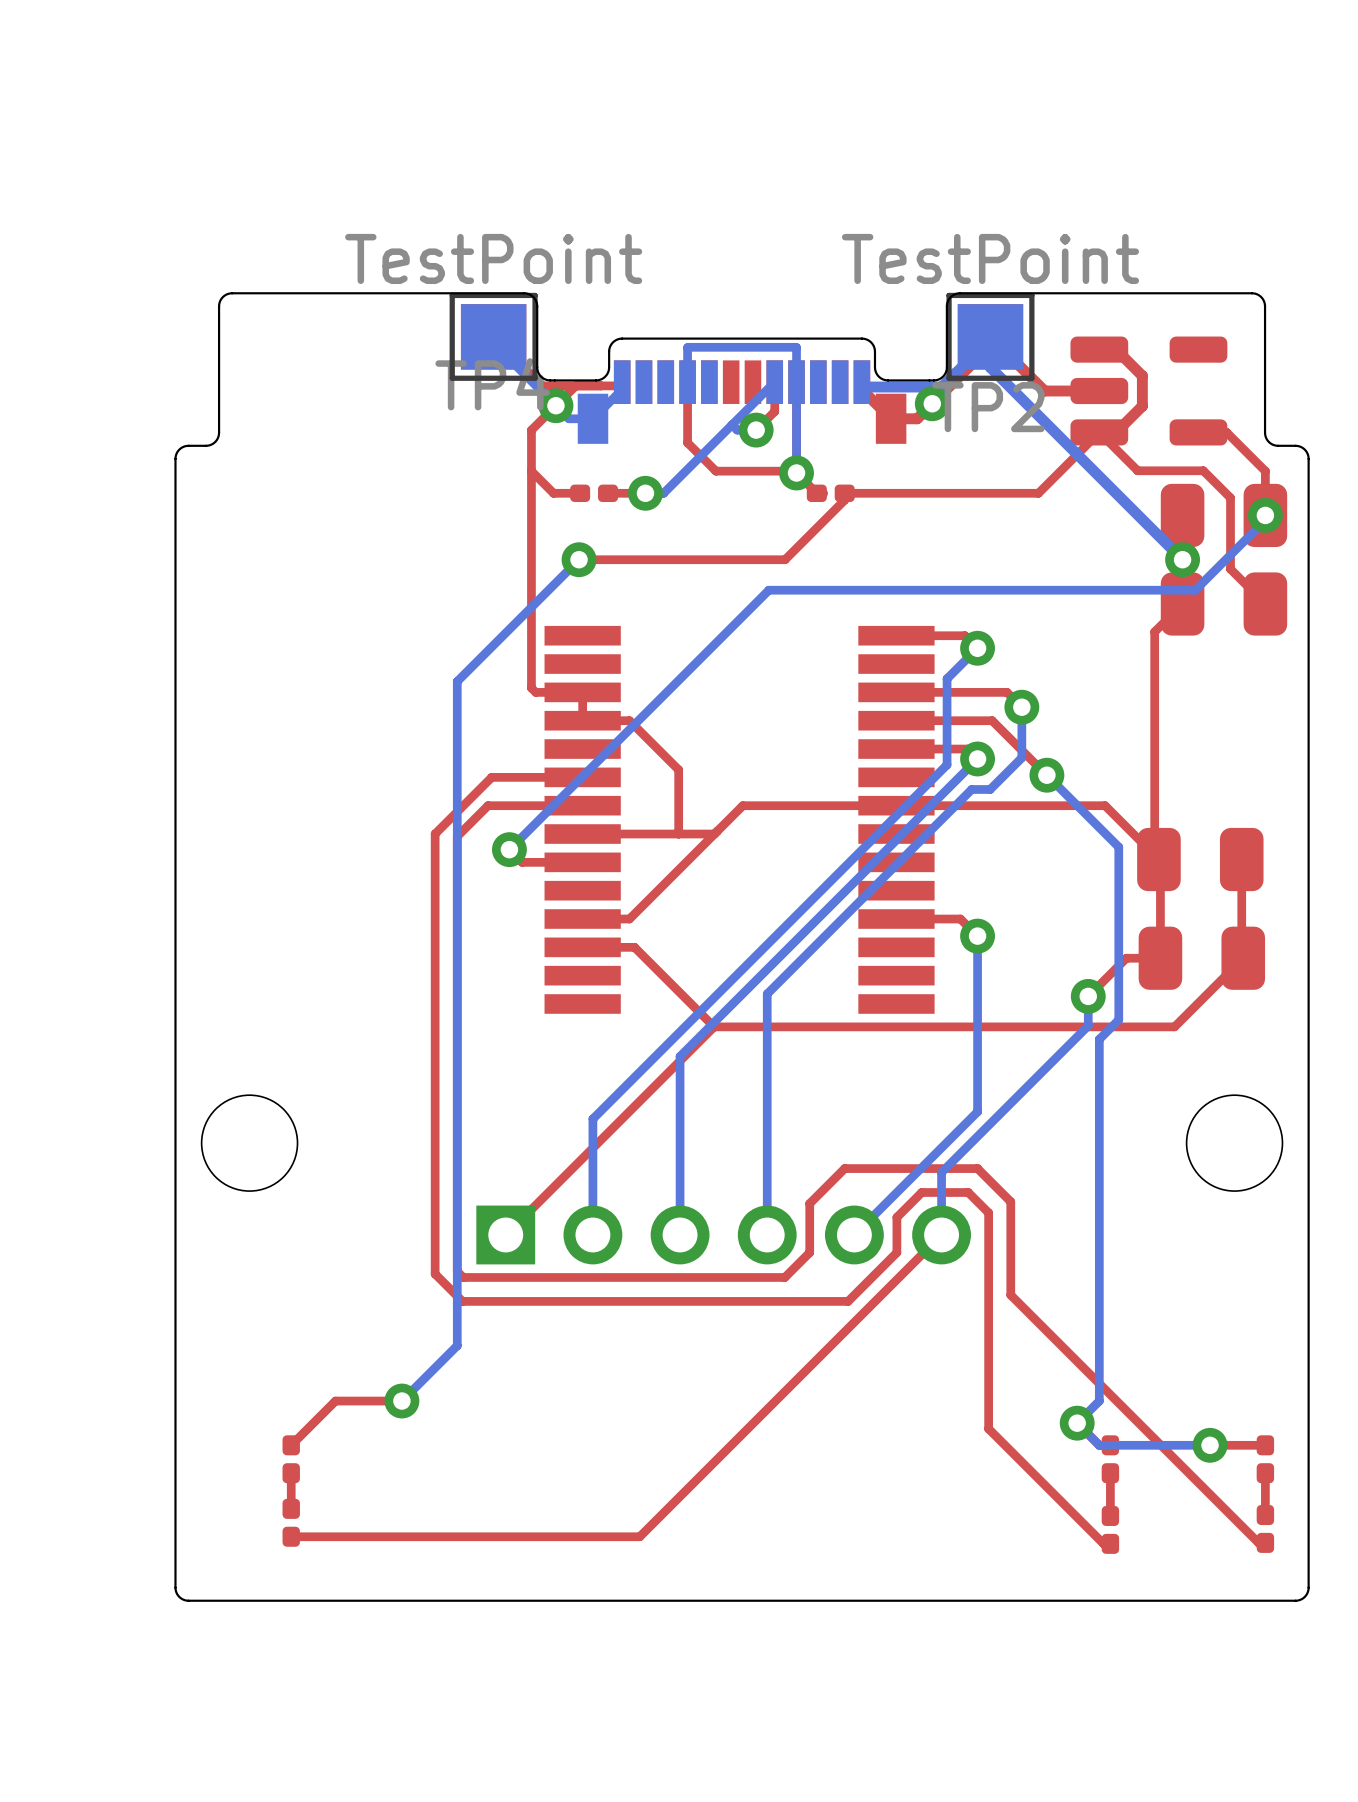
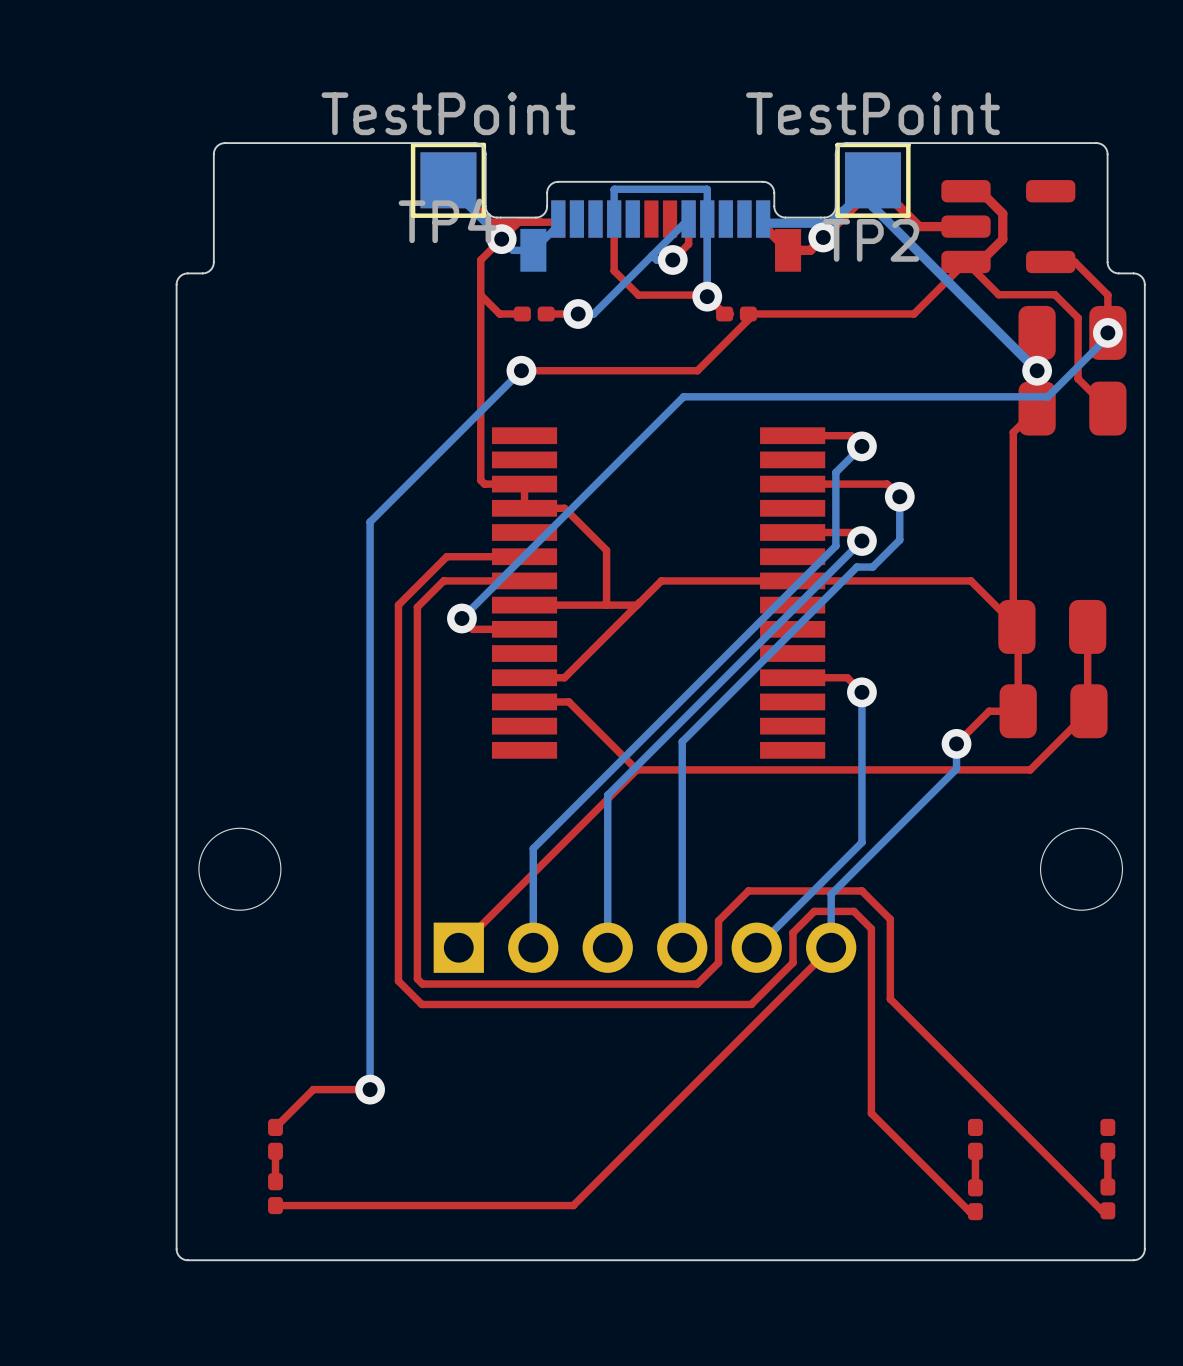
bottom track: (457, 681) (457, 1345) (401, 1401) -> (417, 474) (370, 522) (370, 1089)
top track: (896, 720) (992, 720) (1046, 775) -> none
bottom track: (1046, 775) (1118, 847) (1118, 1019) (1099, 1039) (1099, 1401) (1077, 1423) (1099, 1445) (1210, 1445) -> none
via: (1046, 775) -> none
via: (1077, 1423) -> none
via: (1210, 1445) -> none
top track: (1265, 1445) (1210, 1445) -> none

